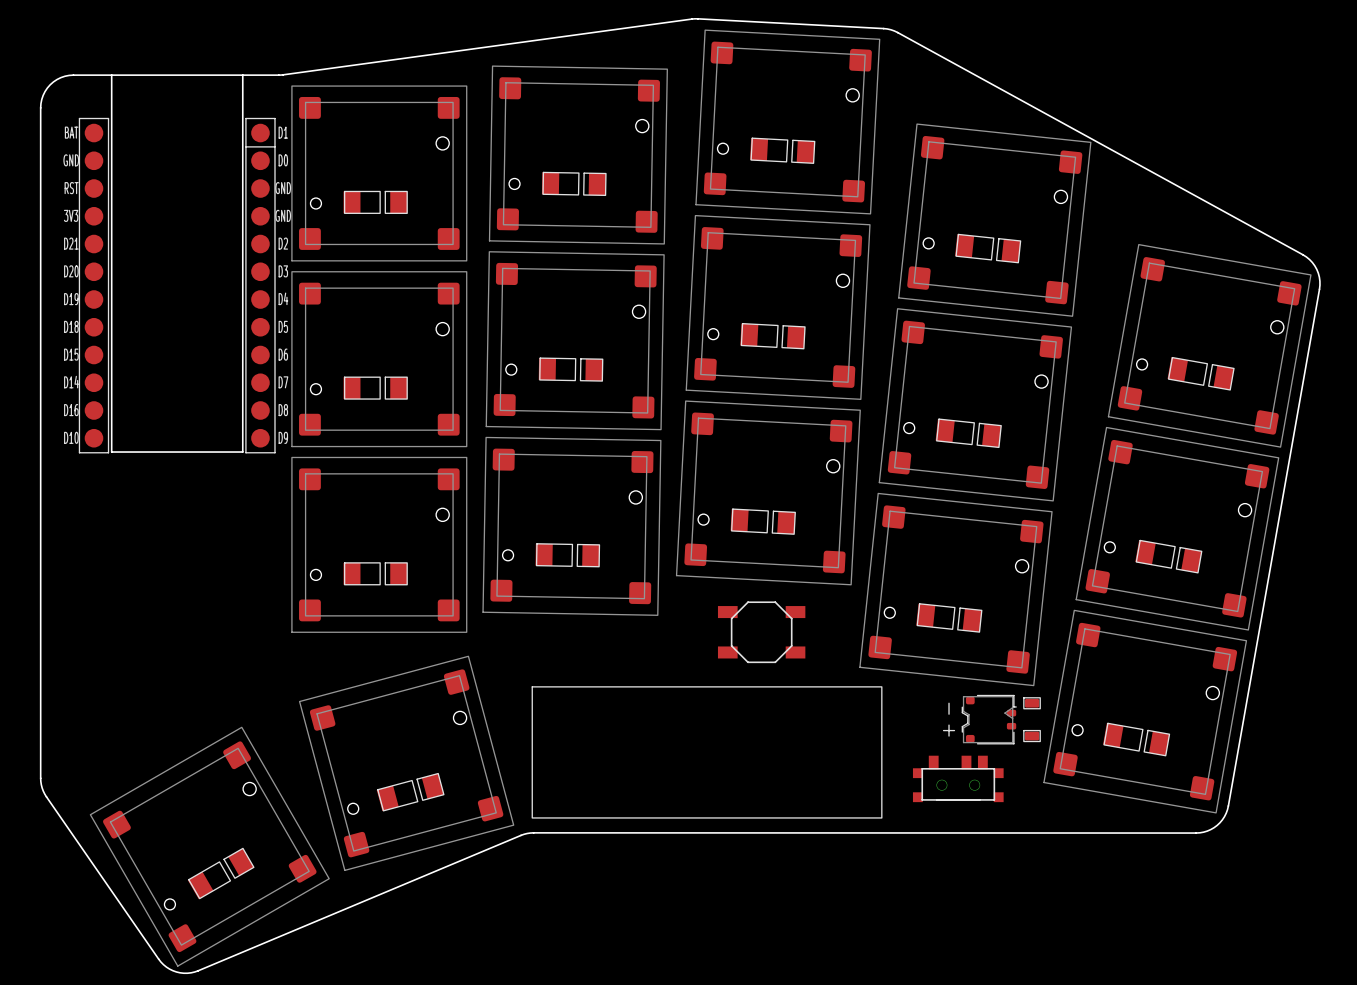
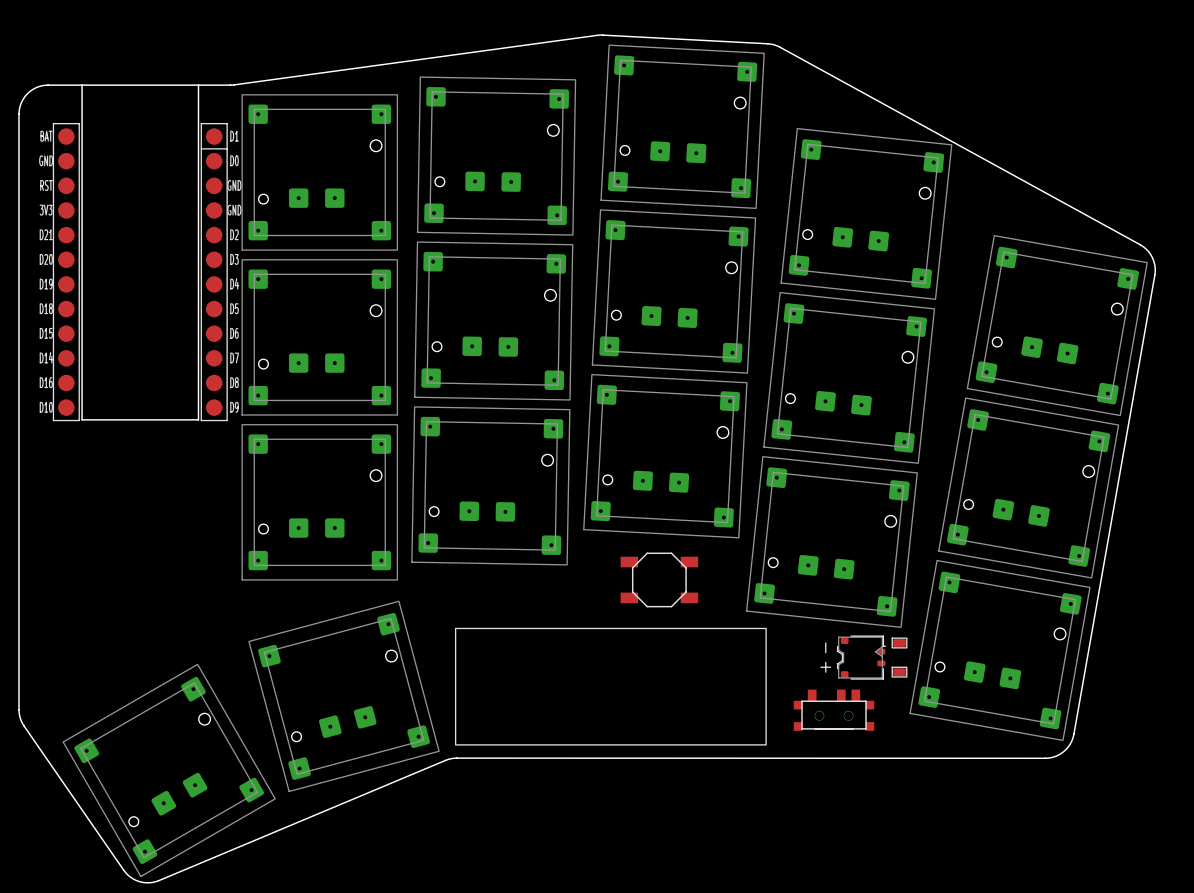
part footprint: [695, 29, 881, 215] -> [600, 44, 765, 209]
part footprint: [488, 65, 668, 245] -> [417, 76, 577, 236]
part footprint: [291, 85, 468, 262] -> [241, 94, 398, 251]
part footprint: [898, 123, 1092, 317] -> [780, 128, 953, 300]
part footprint: [685, 215, 871, 400] -> [591, 209, 757, 374]
part footprint: [1107, 244, 1312, 448] -> [966, 235, 1148, 416]
part footprint: [485, 251, 665, 431] -> [414, 241, 574, 401]
part footprint: [291, 271, 468, 448] -> [241, 259, 398, 416]
part footprint: [878, 308, 1072, 502] -> [763, 292, 935, 464]
part footprint: [676, 400, 861, 586] -> [583, 374, 748, 539]
part footprint: [1075, 426, 1280, 631] -> [938, 397, 1120, 579]
part footprint: [482, 436, 662, 616] -> [411, 406, 571, 566]
part footprint: [291, 456, 468, 633] -> [241, 424, 398, 581]
part footprint: [859, 492, 1053, 687] -> [746, 456, 918, 628]
part footprint: [1043, 609, 1247, 814] -> [909, 560, 1091, 741]
part footprint: [299, 655, 515, 871] -> [248, 600, 440, 792]
part footprint: [89, 726, 330, 967] -> [62, 663, 276, 877]

